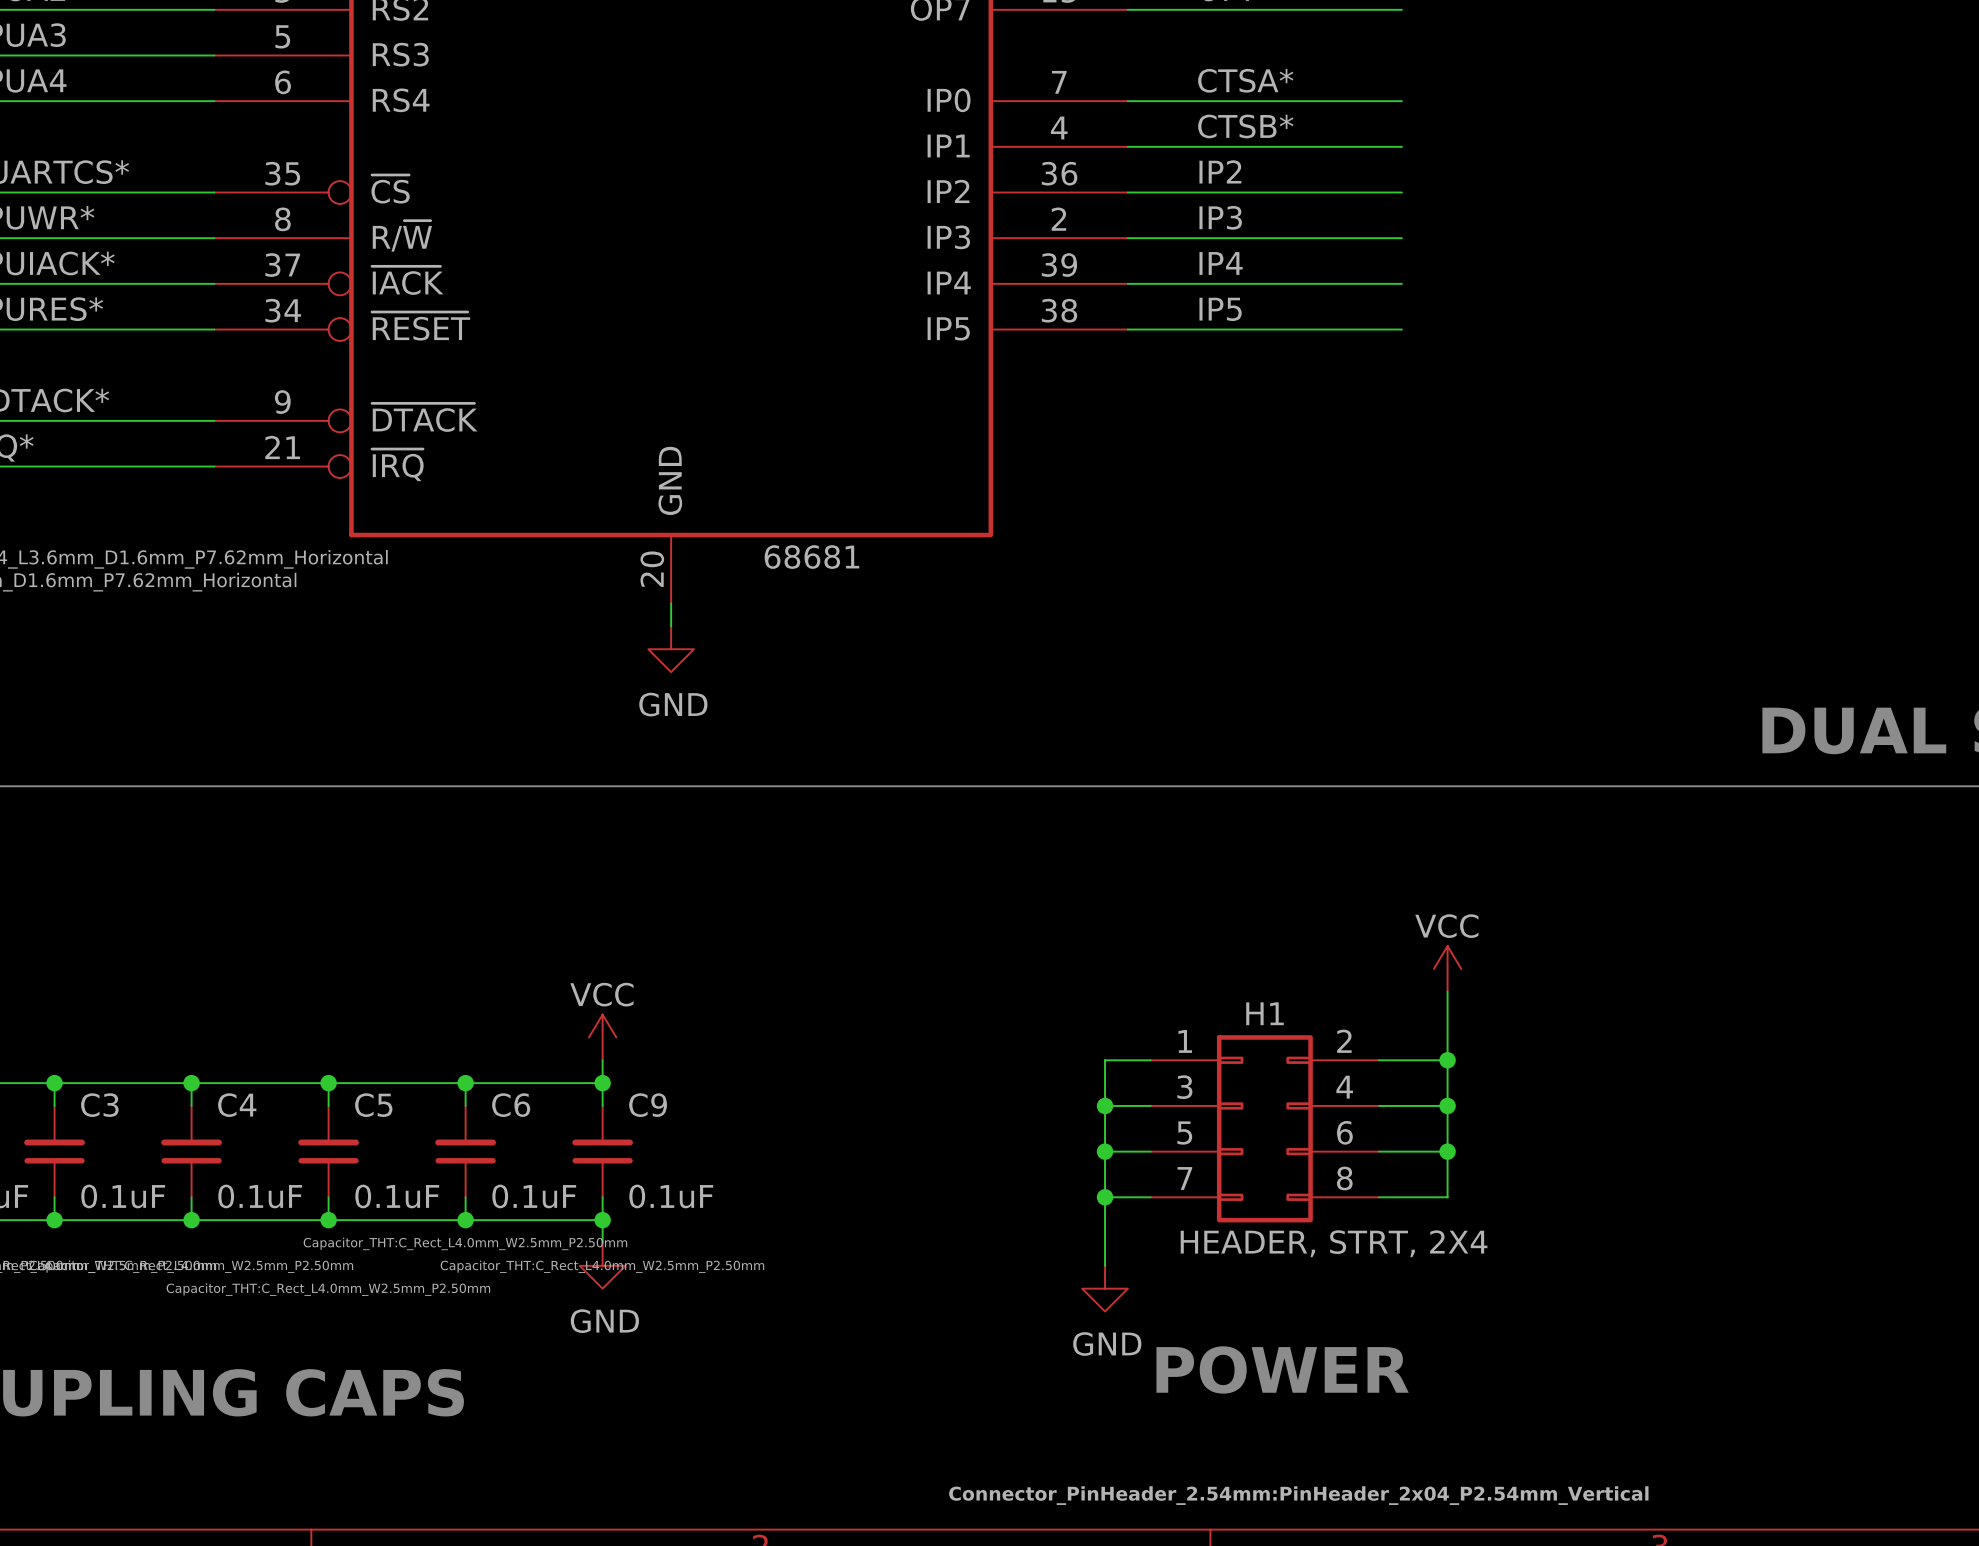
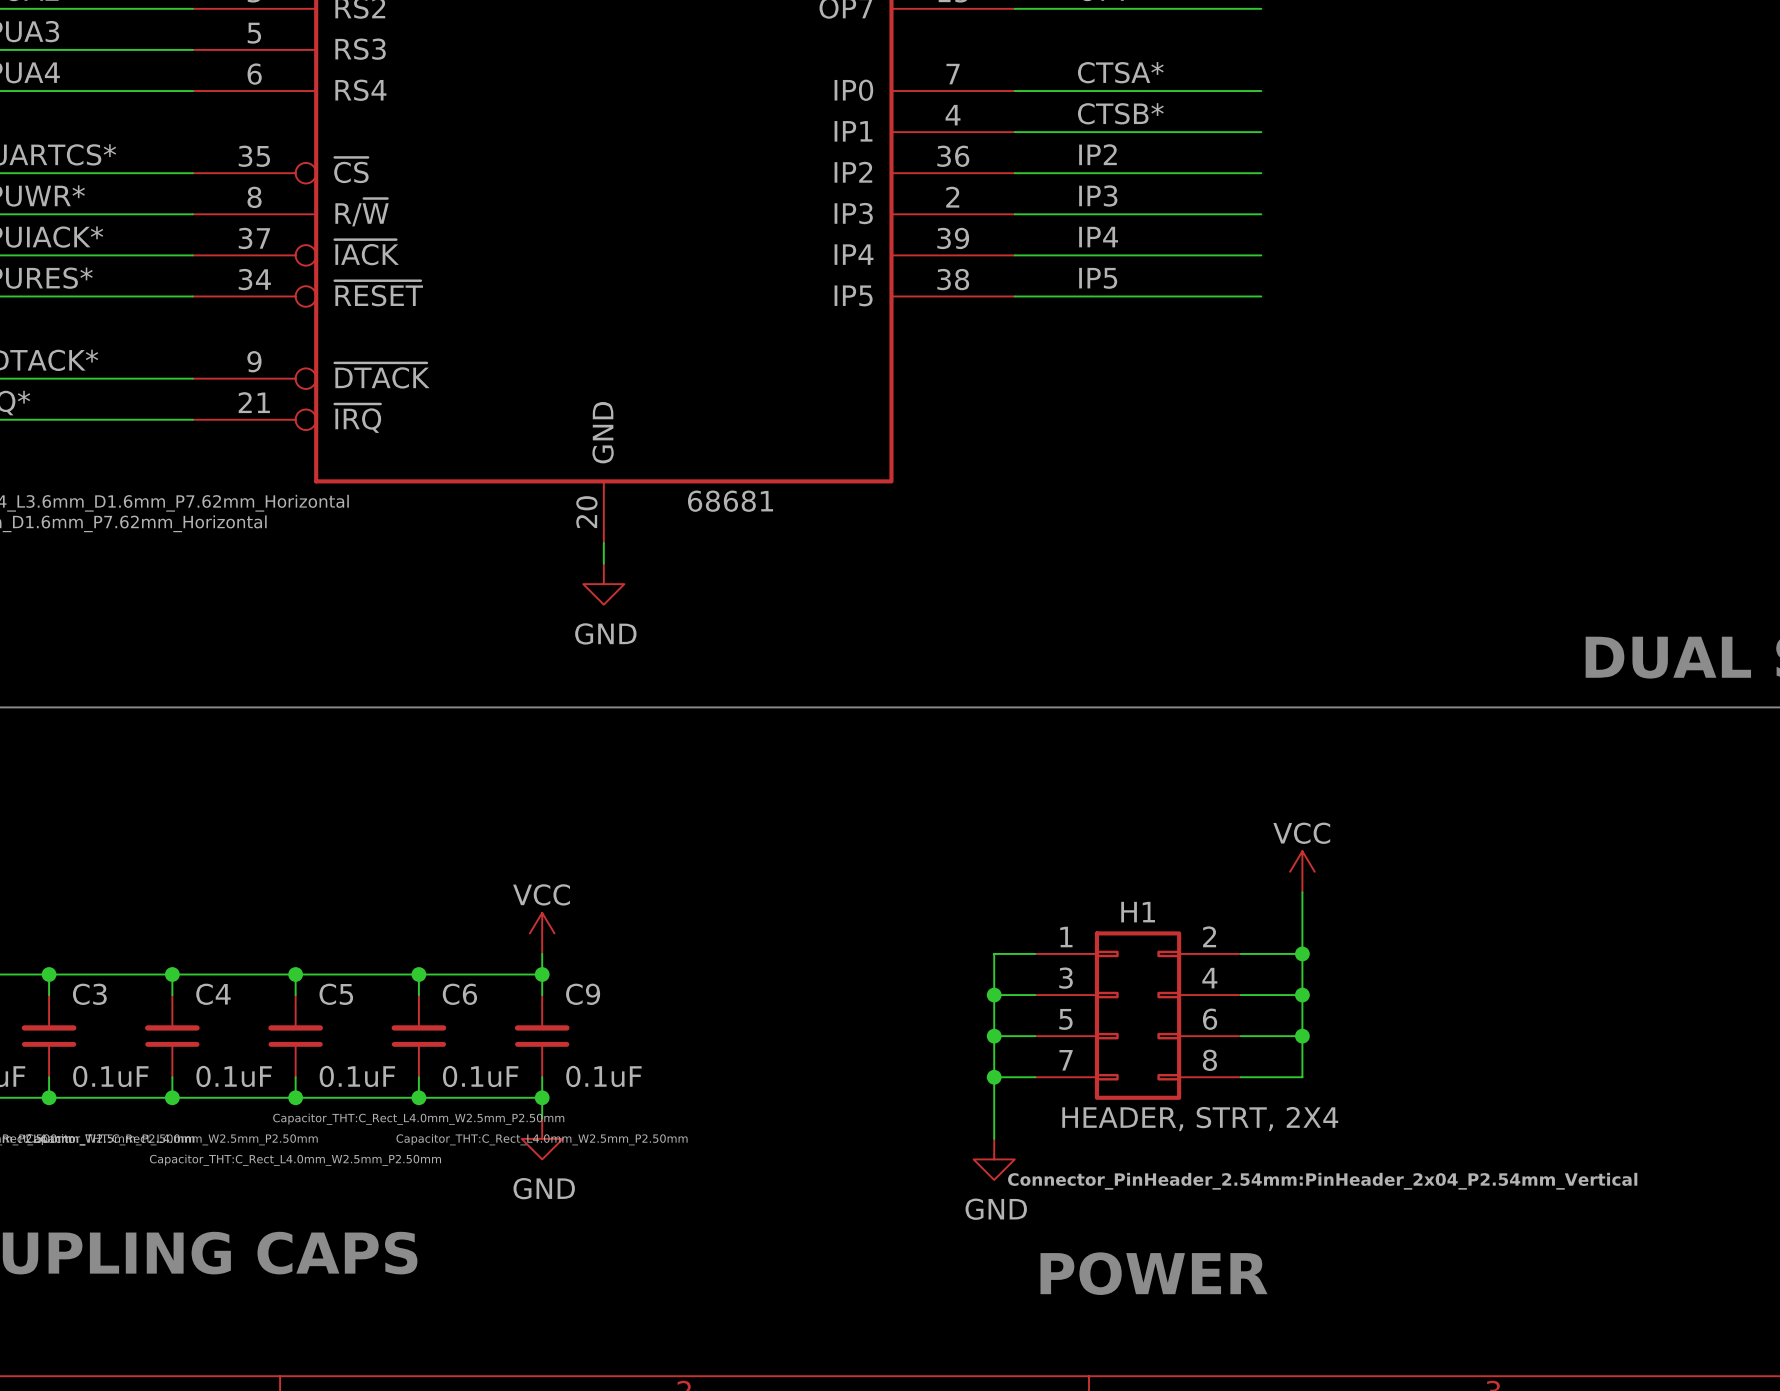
text position: POWER (1282, 1369) -> POWER (1153, 1273)
H1 text position: Connector_PinHeader_2.54mm:PinHeader_2x04_P2.54mm_Vertical (1298, 1495) -> Connector_PinHeader_2.54mm:PinHeader_2x04_P2.54mm_Vertical (1322, 1181)

